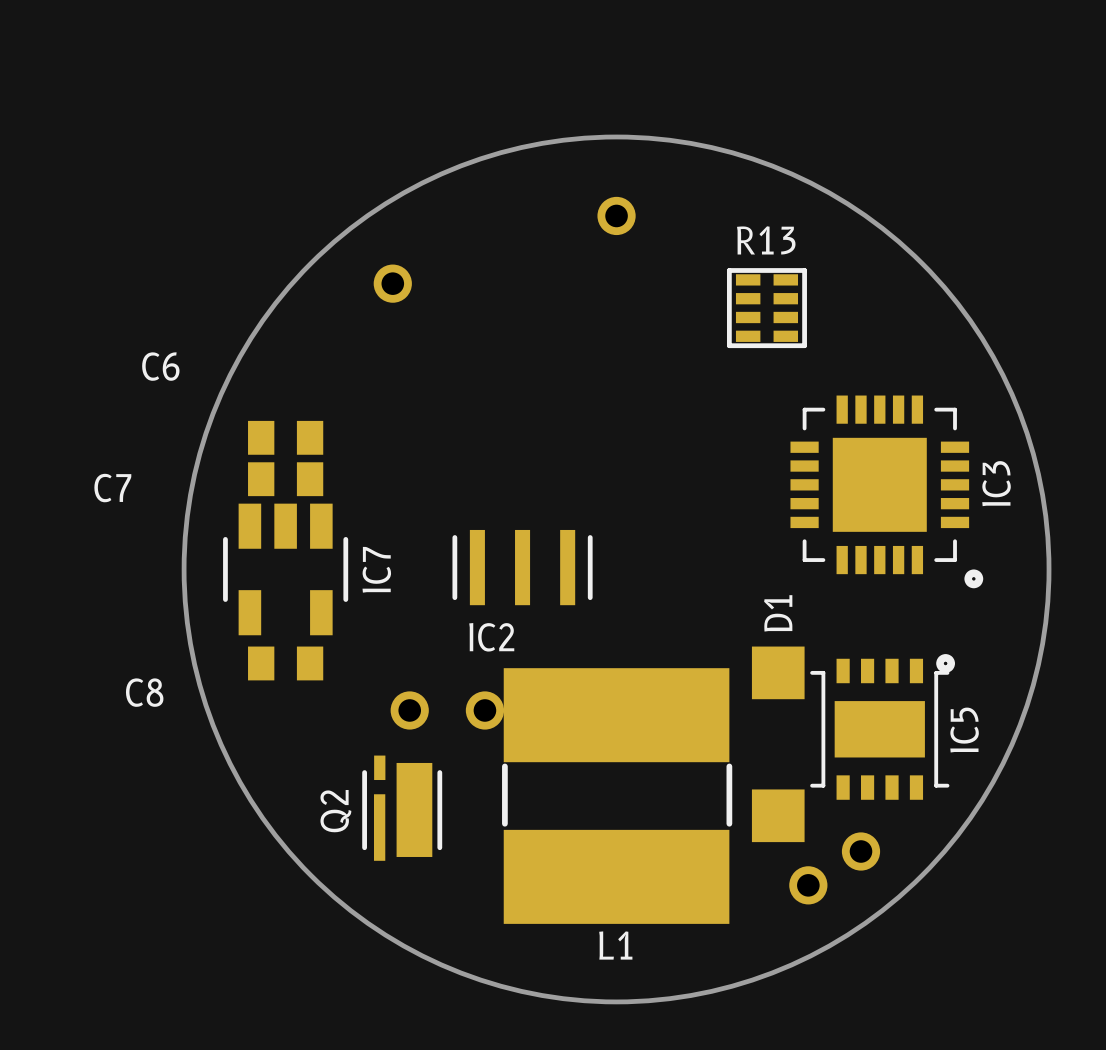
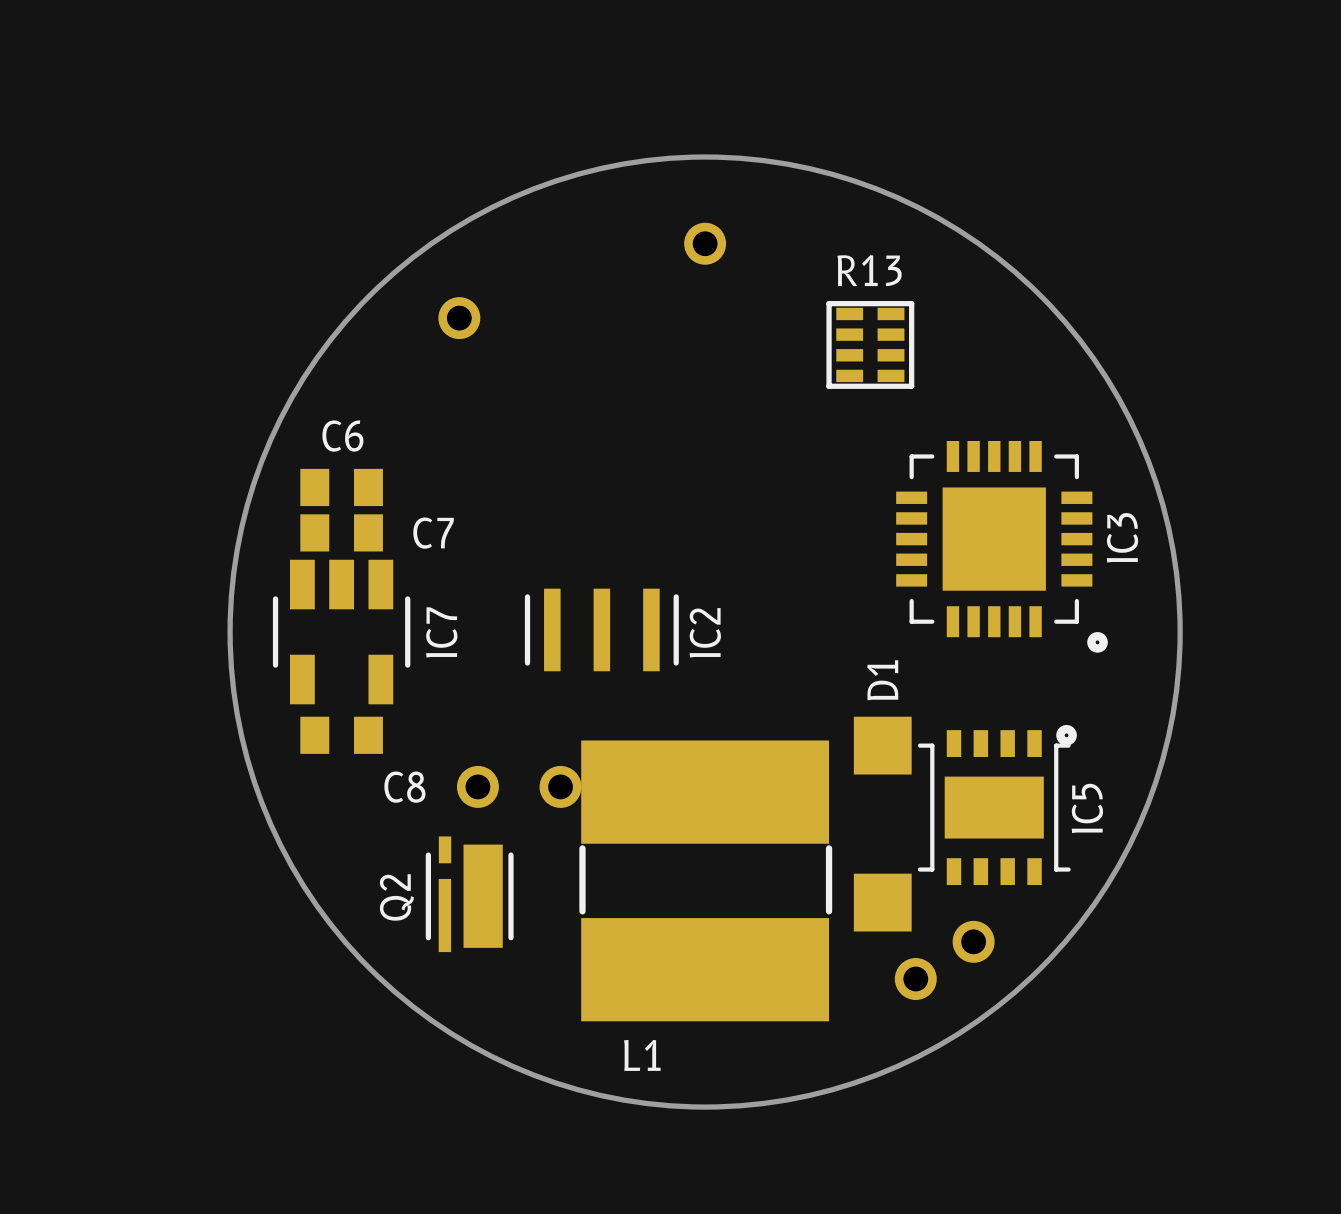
C6 name position: C6 (160, 366) -> C6 (342, 436)
C7 name position: C7 (112, 488) -> C7 (433, 533)
IC2 name rotation: 0° (491, 637) -> 90° counterclockwise (705, 632)
IC2 name position: IC2 (491, 637) -> IC2 (705, 632)
C8 name position: C8 (144, 692) -> C8 (404, 787)
L1 name position: L1 (615, 945) -> L1 (642, 1055)

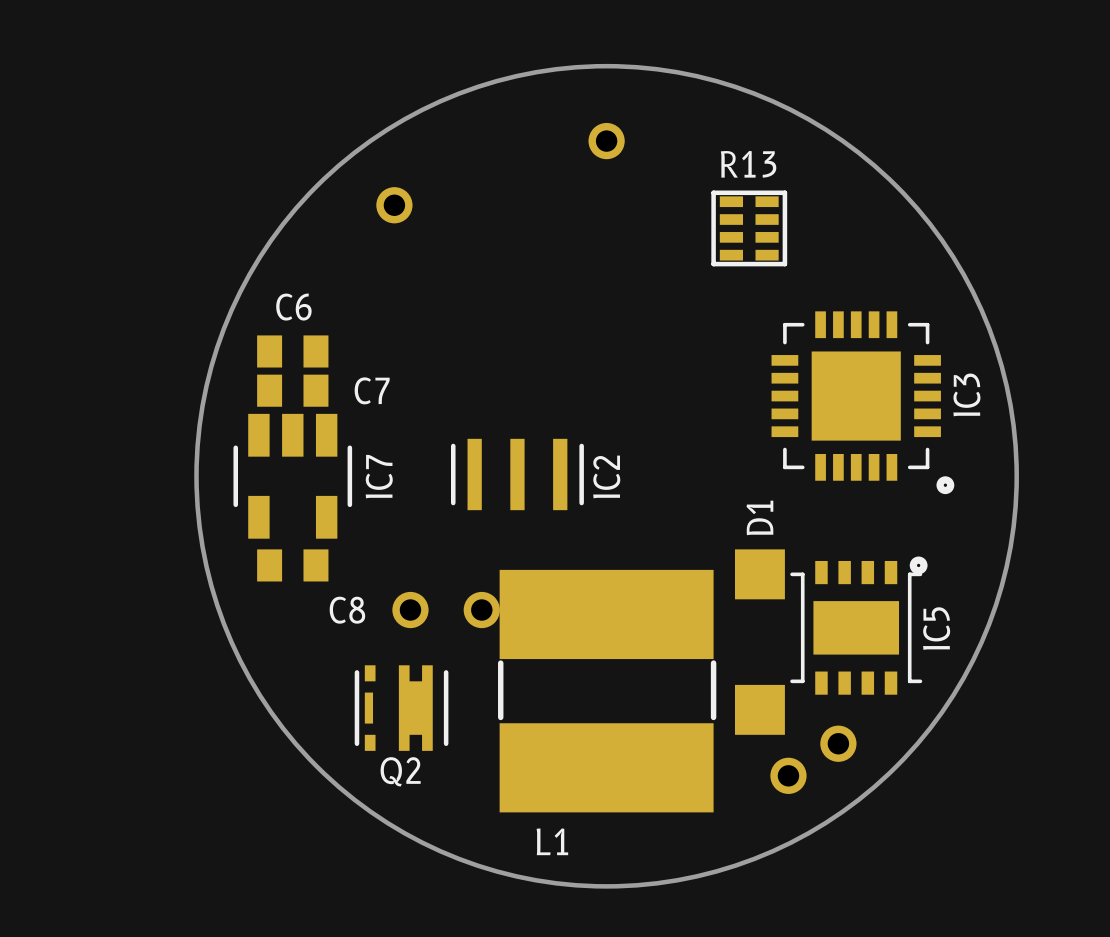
Q2 footprint: [425, 836, 514, 953] -> [354, 665, 449, 751]
Q2 name rotation: 0° (396, 897) -> 90° clockwise (400, 771)
Q2 name position: Q2 (396, 897) -> Q2 (400, 771)

